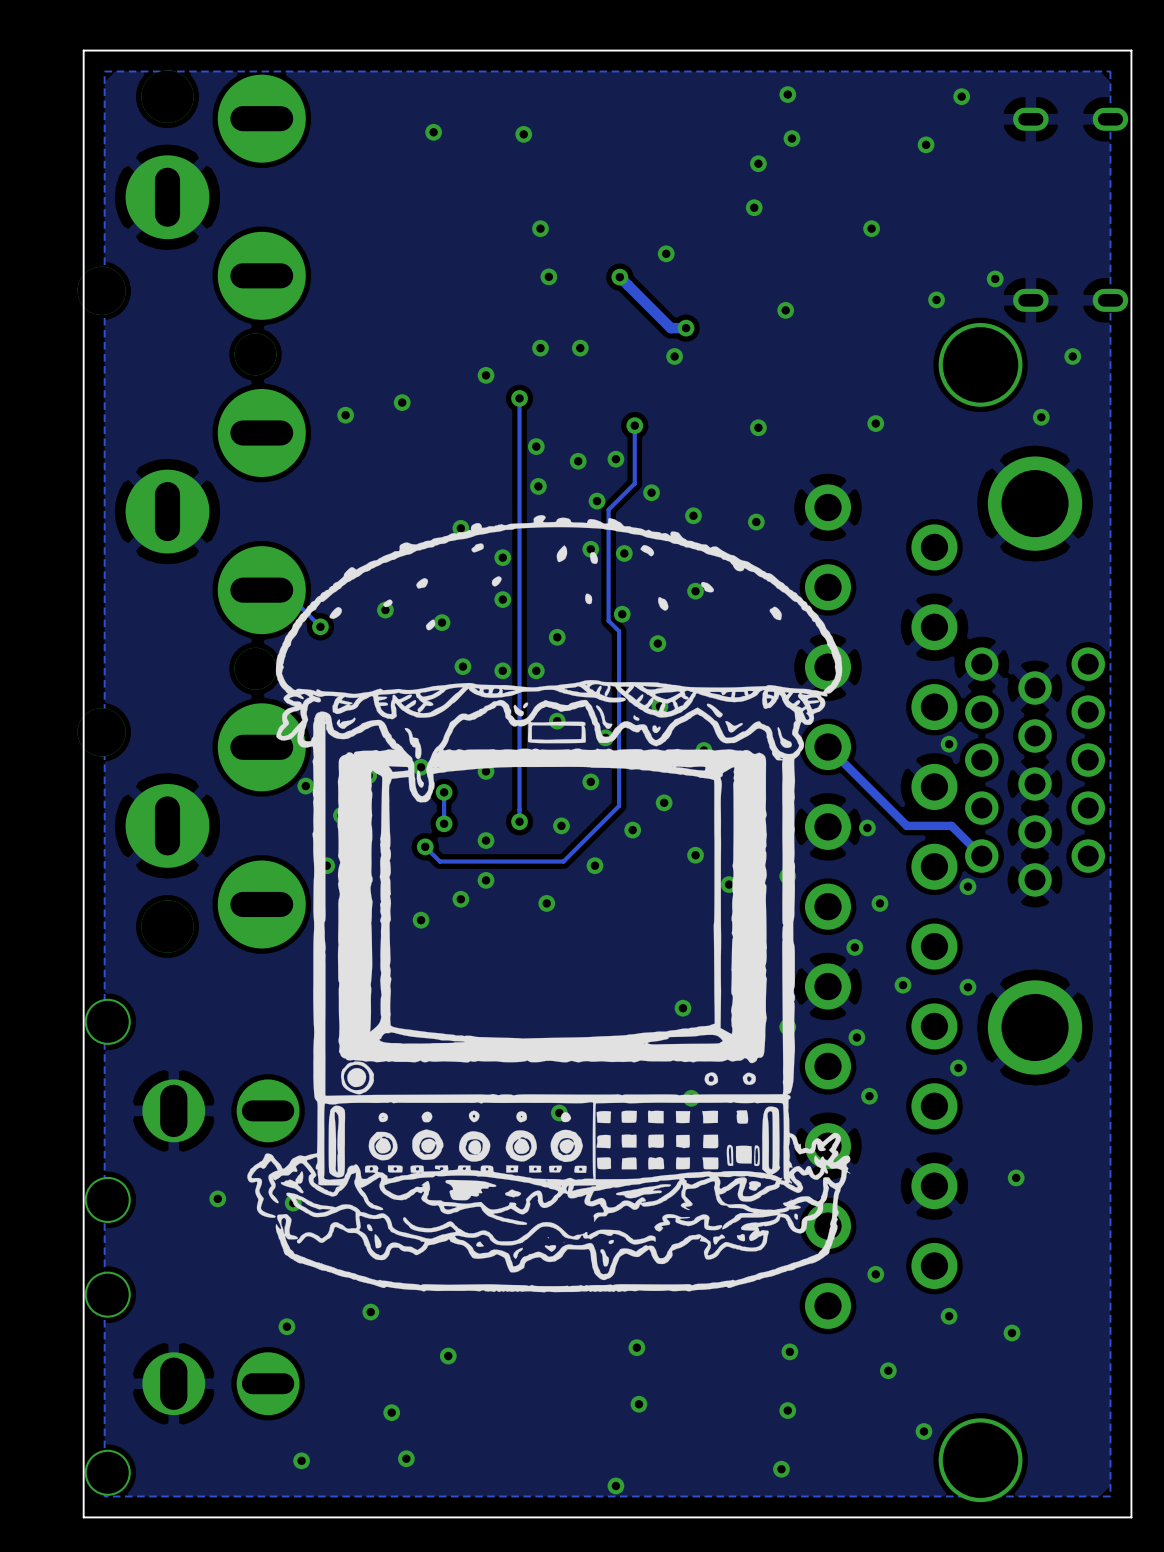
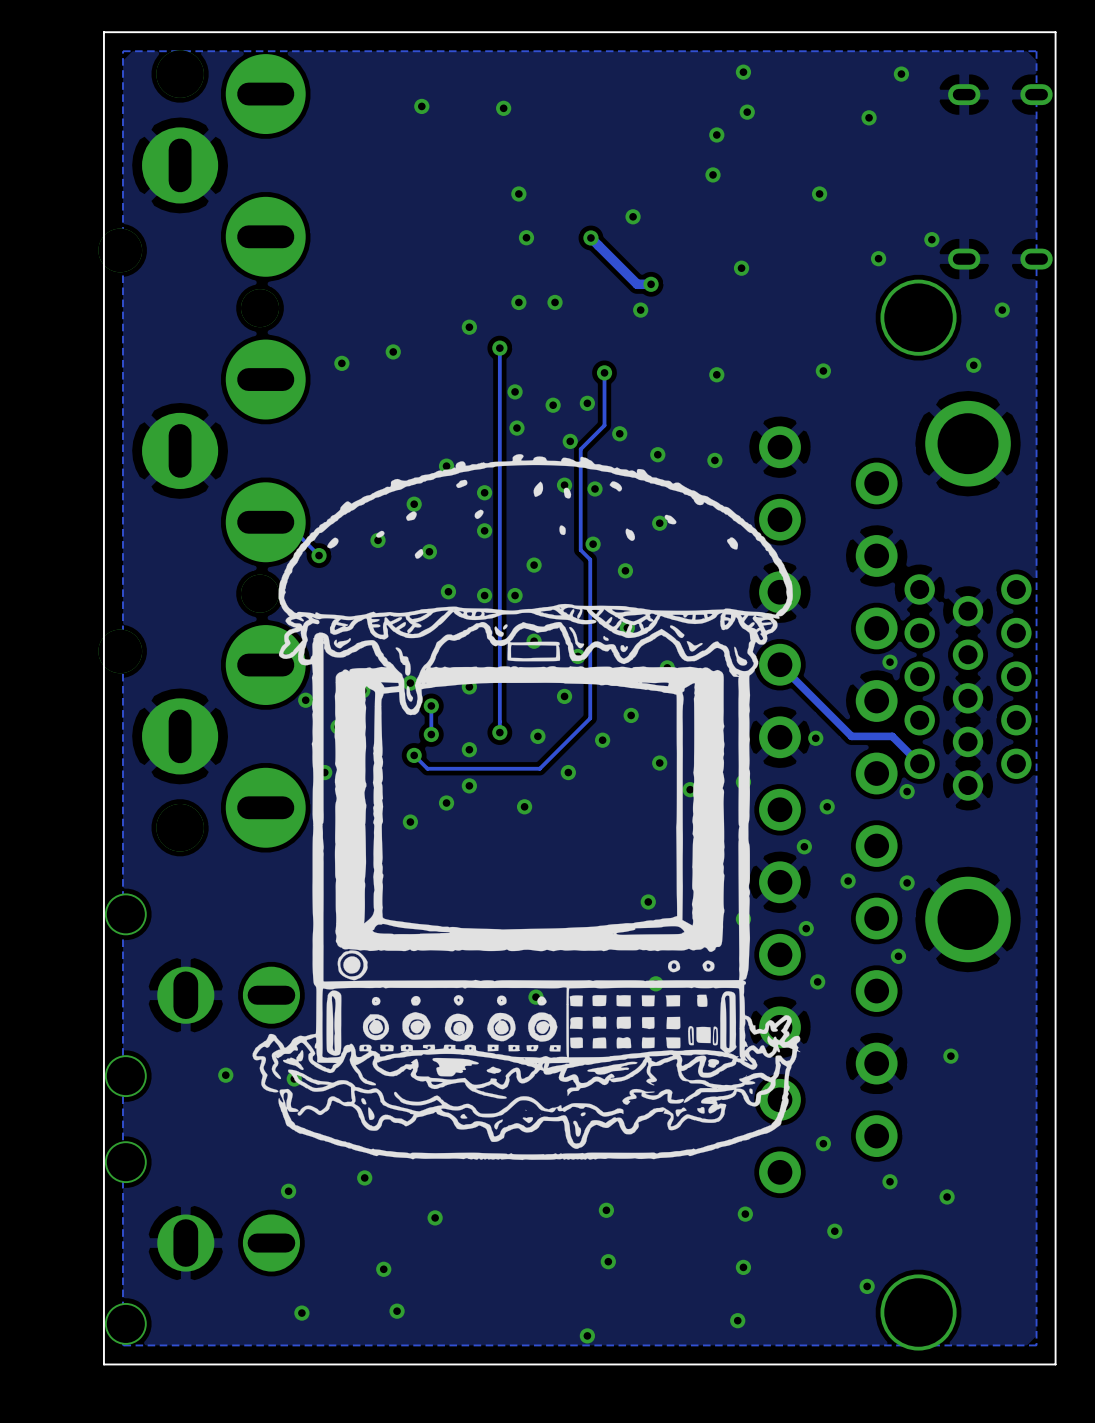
via: none -> (414, 504)

